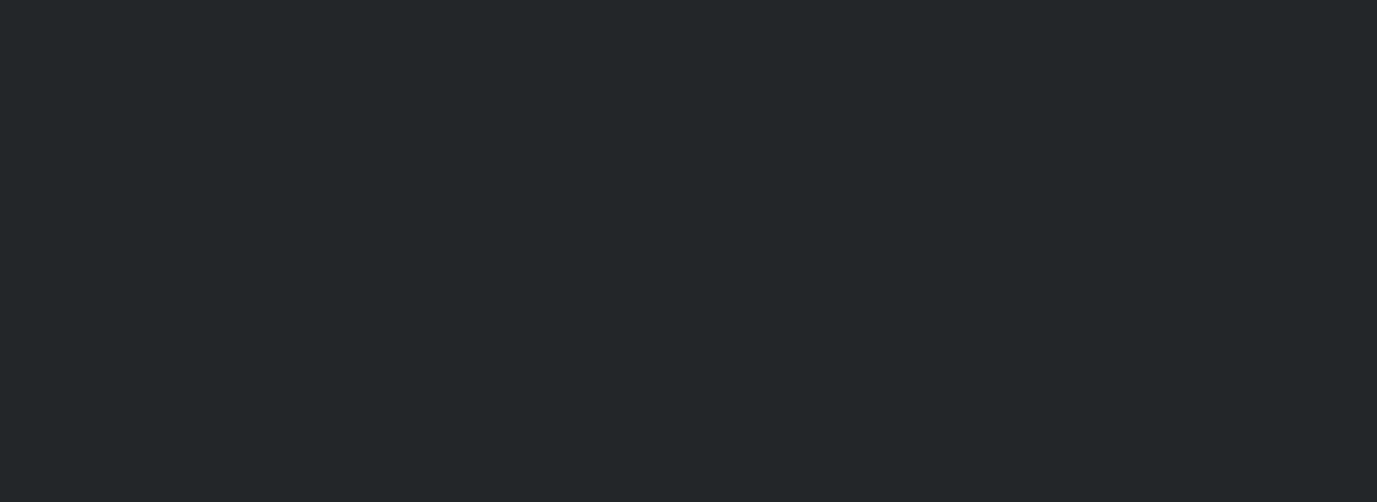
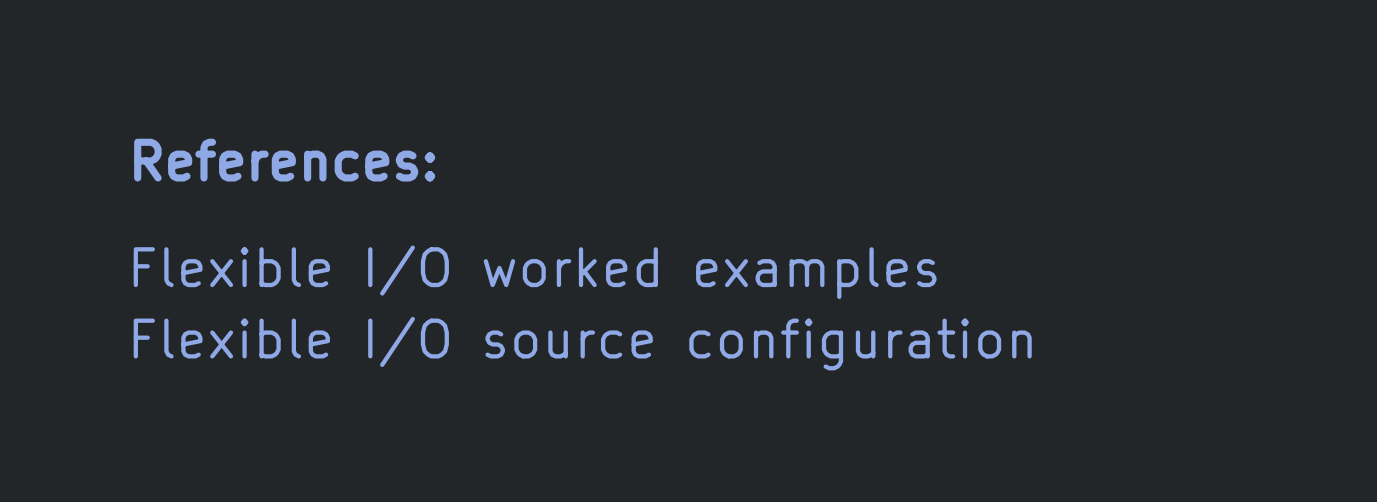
text: none -> References: (284, 160)
text: none -> Flexible I/O worked examples (535, 272)
text: none -> Flexible I/O source configuration (582, 343)

